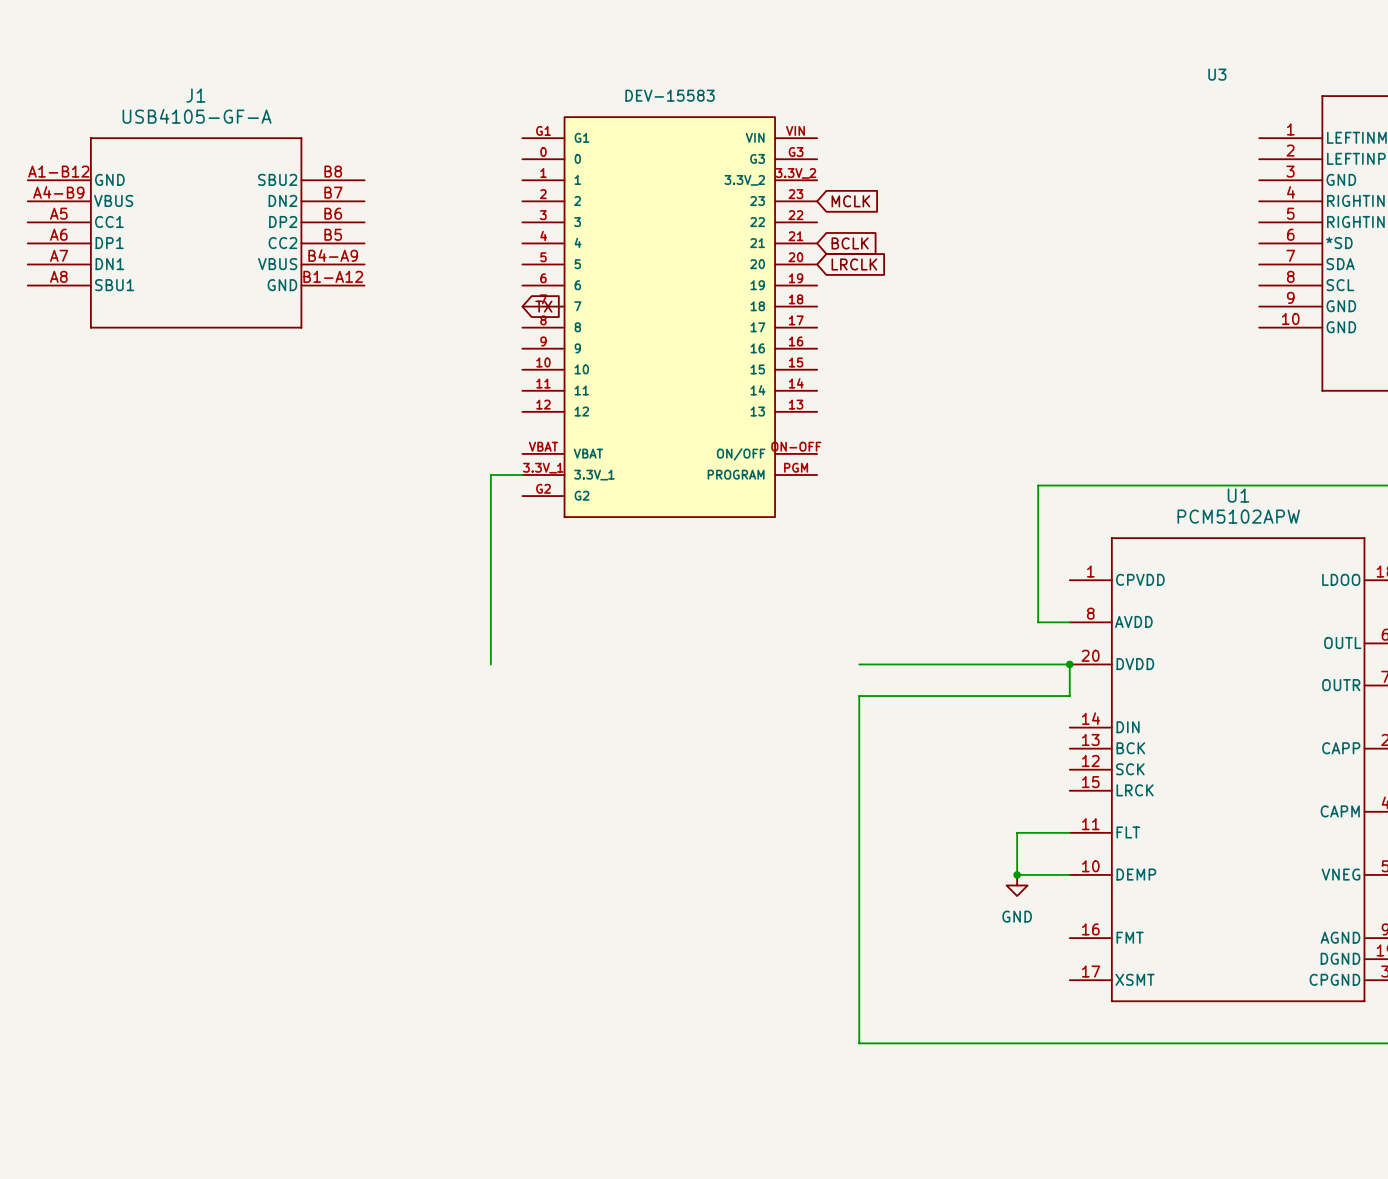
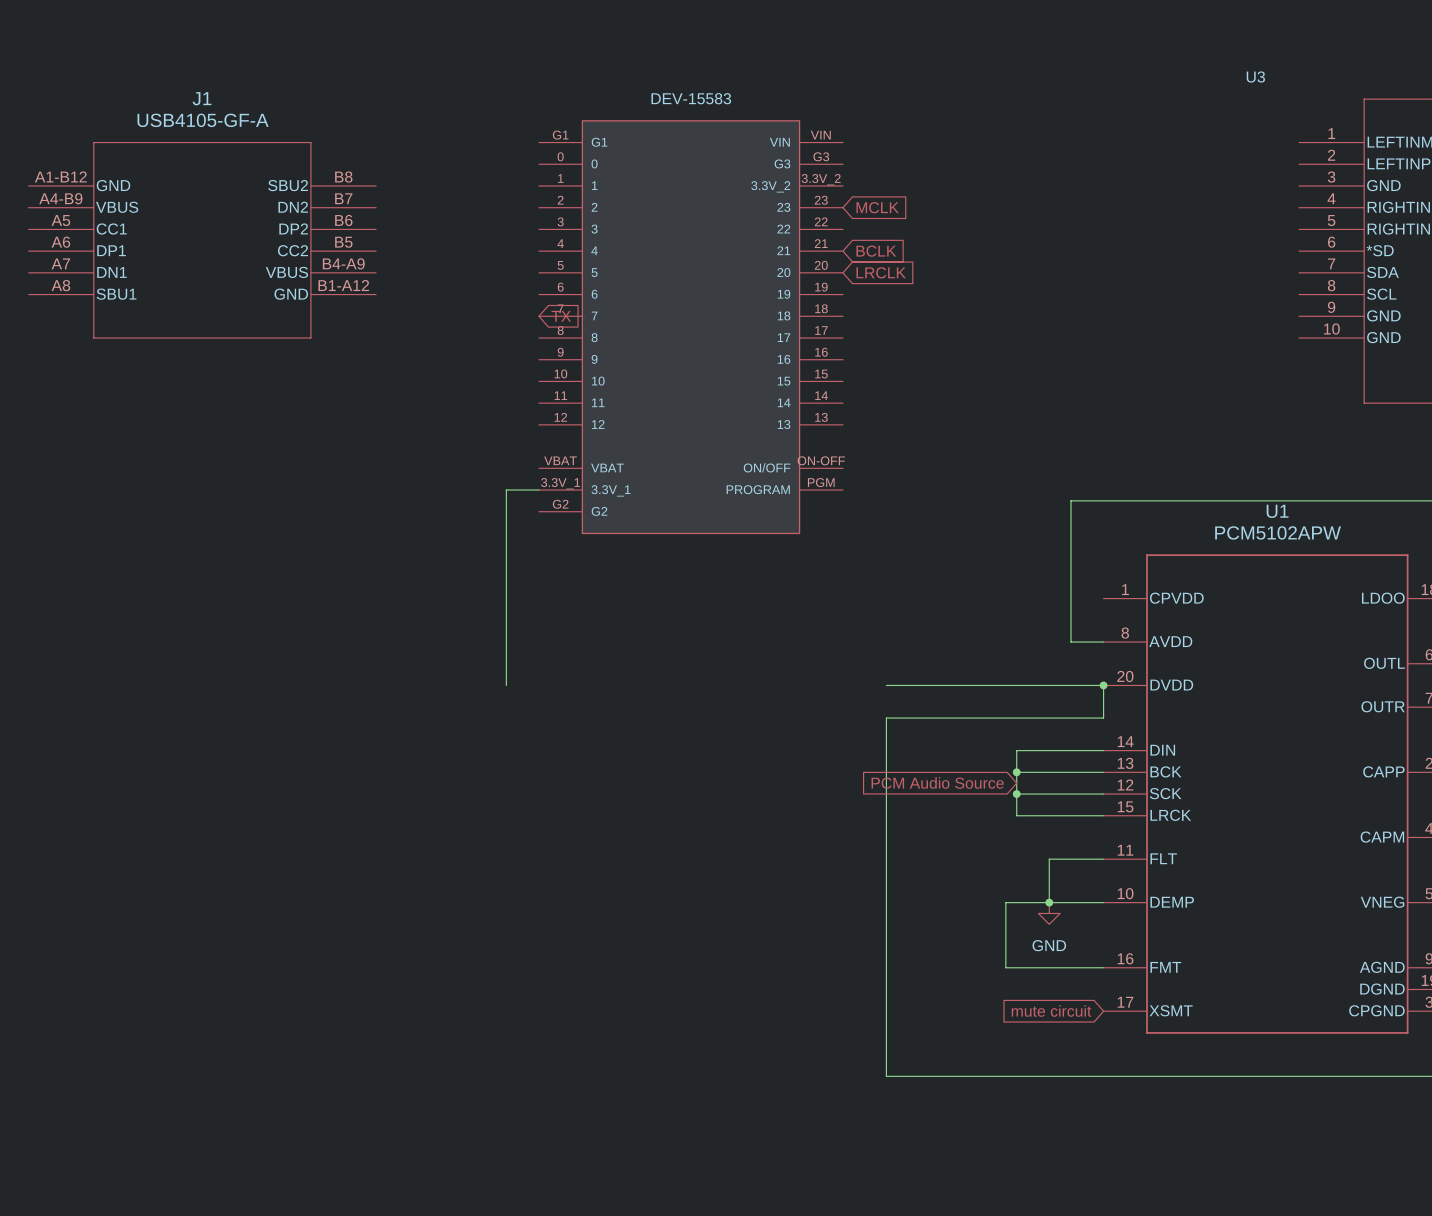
wire: none -> (1103, 750) (1016, 750) (1016, 815) (1103, 815)
wire: none -> (1016, 772) (1103, 772)
junction: none -> (1016, 772)
global label: none -> PCM Audio Source (937, 782)
wire: none -> (1016, 794) (1103, 794)
junction: none -> (1016, 794)
wire: none -> (1049, 902) (1005, 902) (1005, 967) (1103, 967)
global label: none -> mute circuit (1051, 1010)

